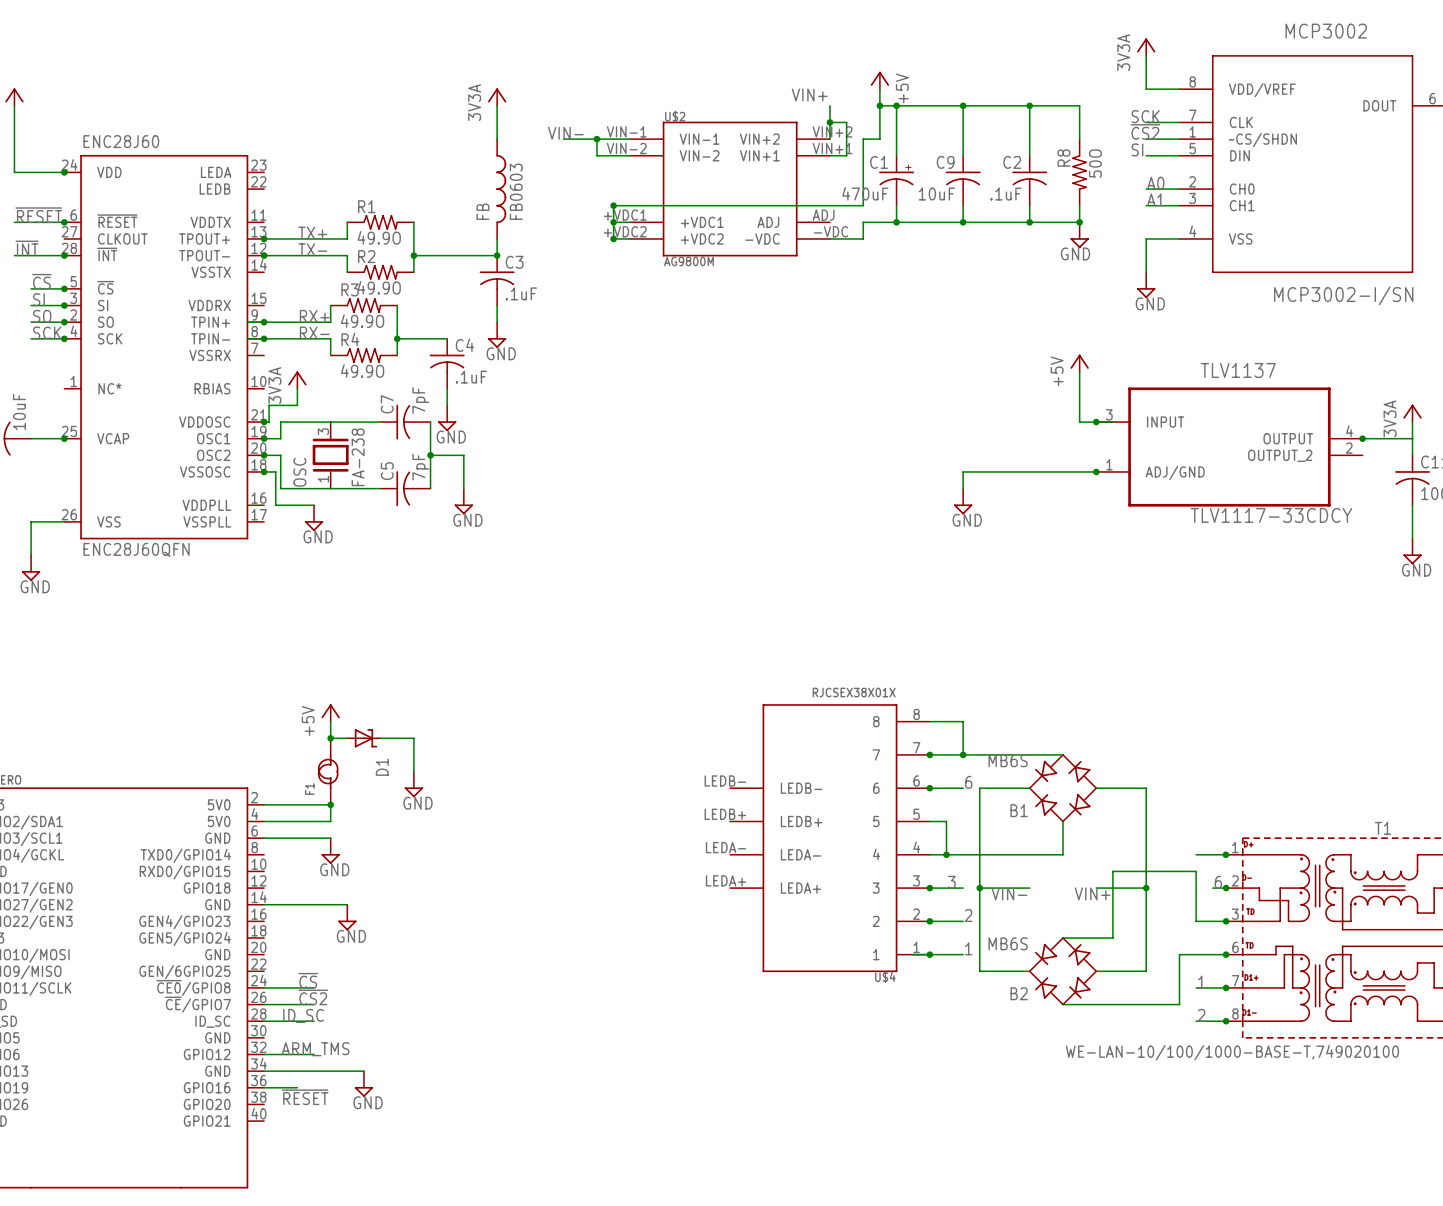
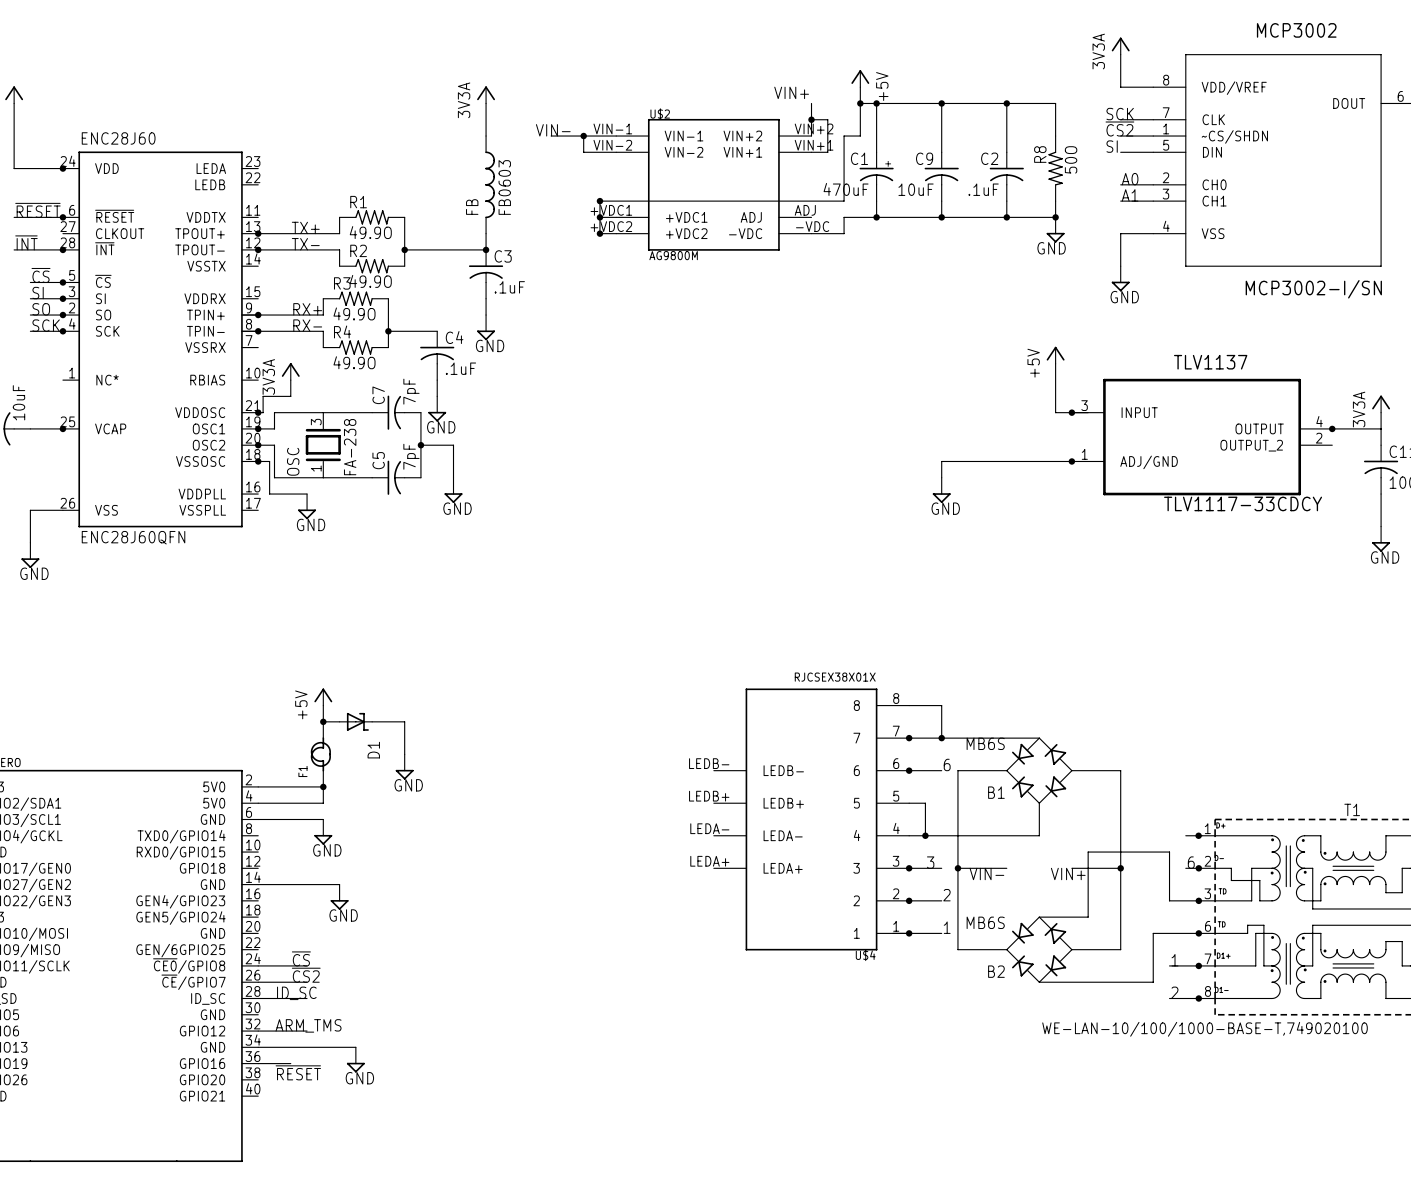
wire: (1196, 854) (1212, 854) -> none

